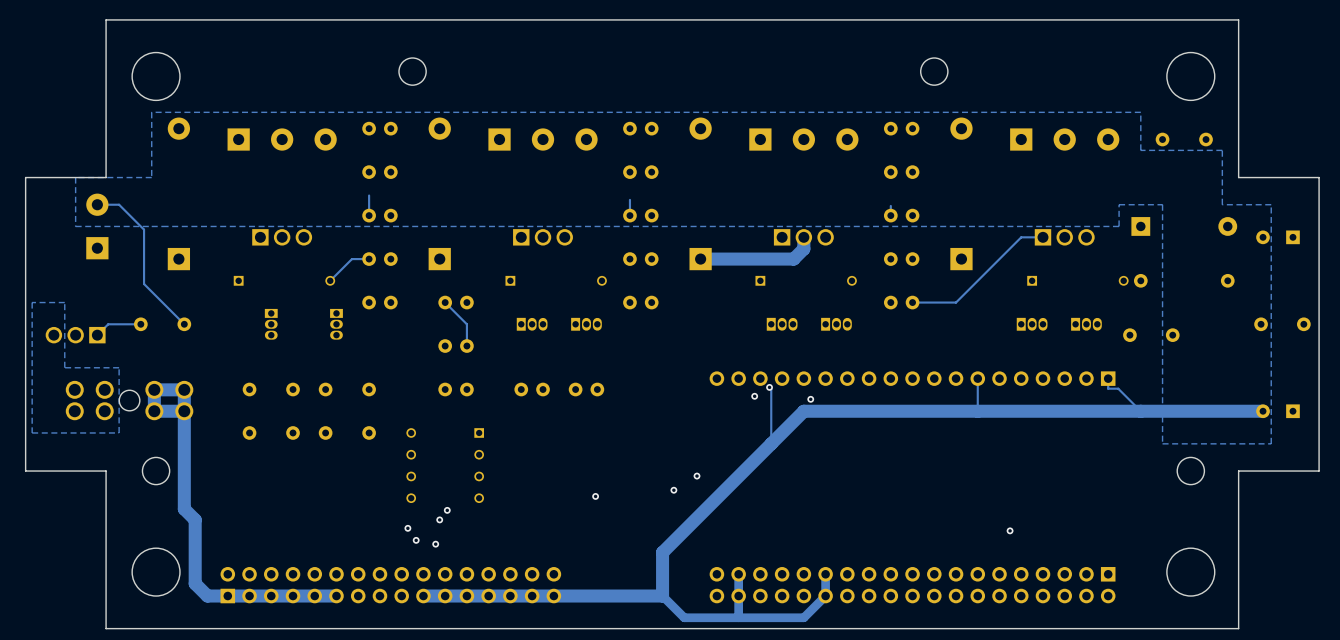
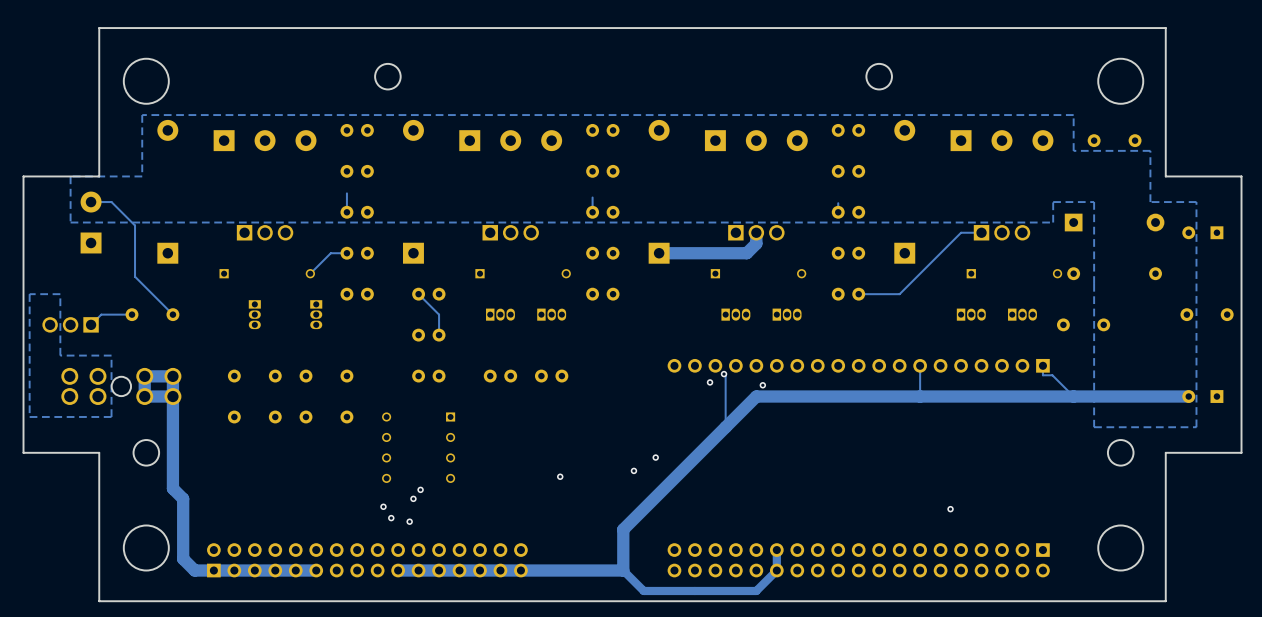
track: (738, 574) (738, 617) -> none

